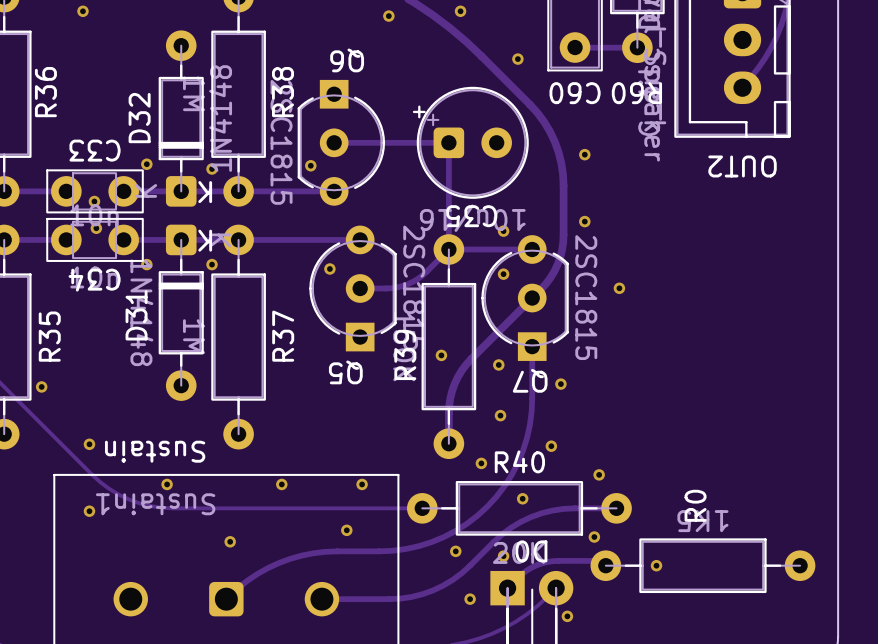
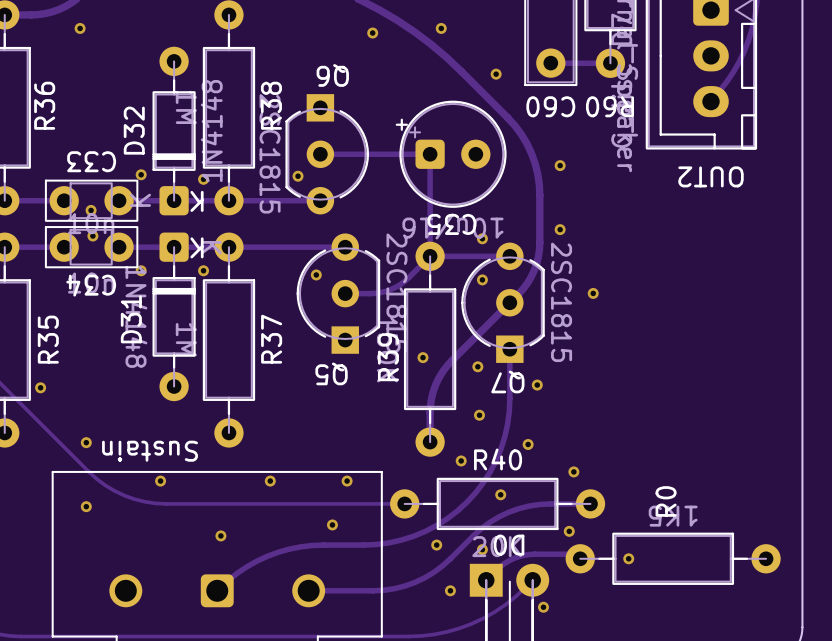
Sustain1 text: Sustain (155, 451) -> none
Sustain1 name: Sustain1 (155, 504) -> Sustain (150, 451)

